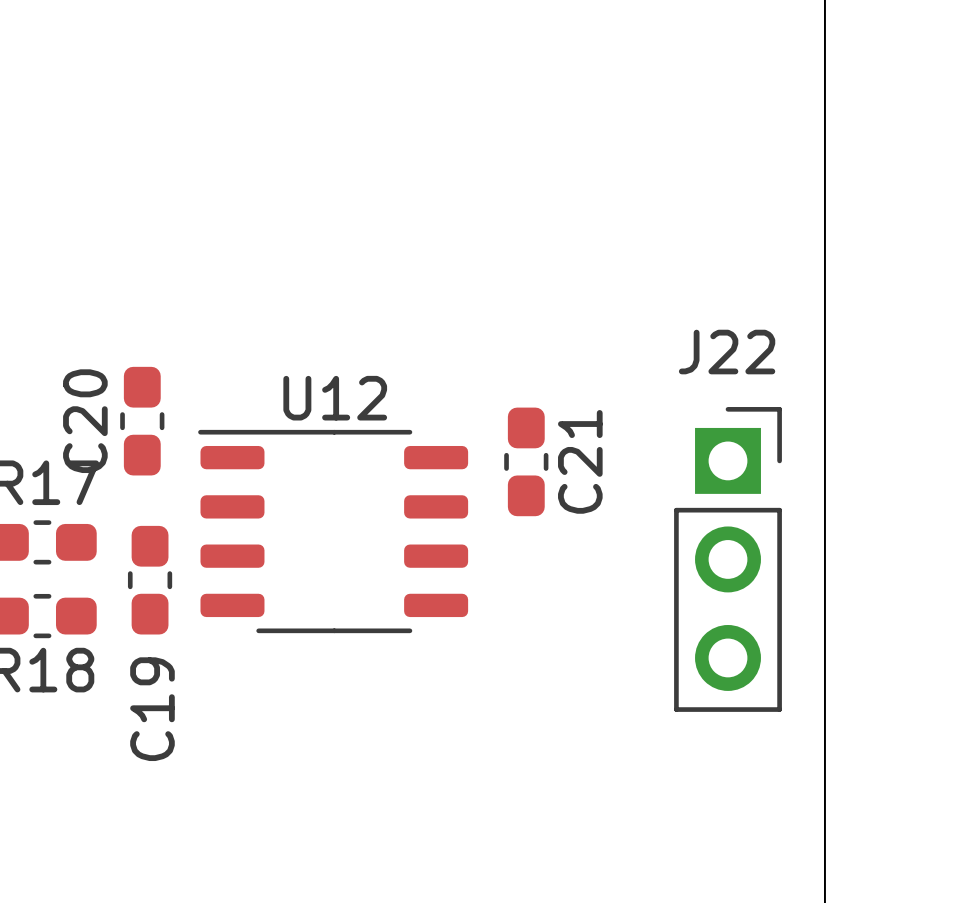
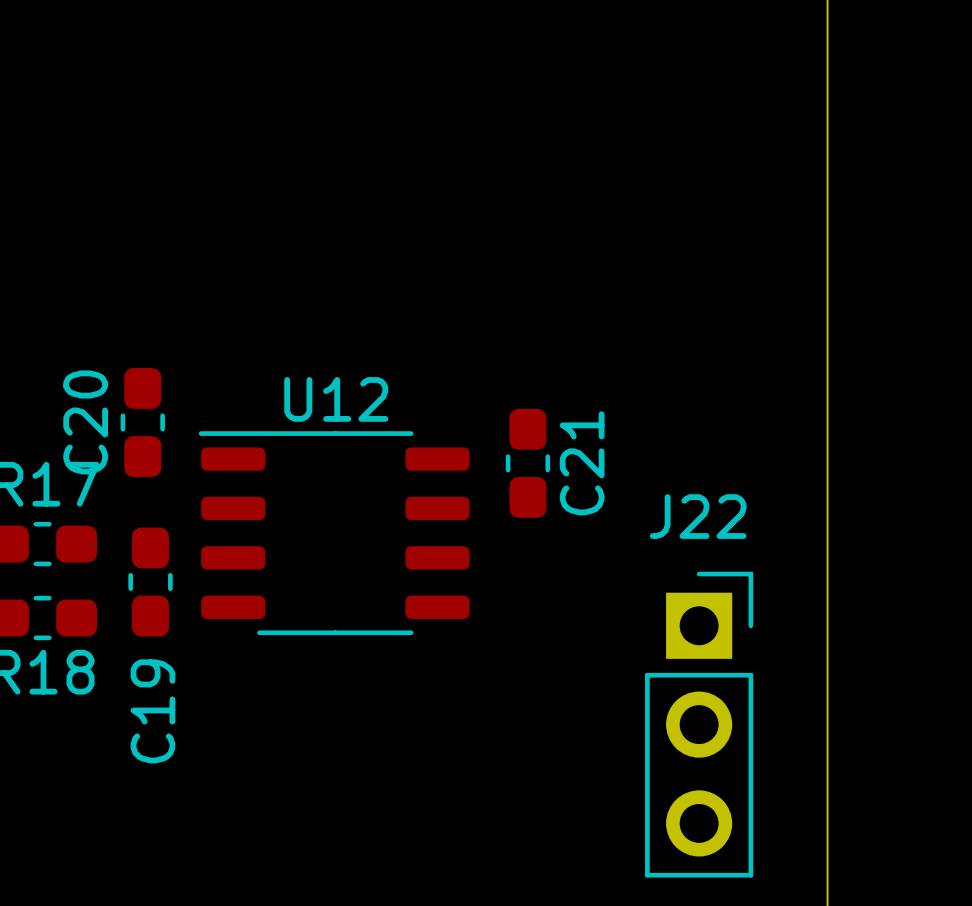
J22 position: (728, 559) -> (699, 724)

